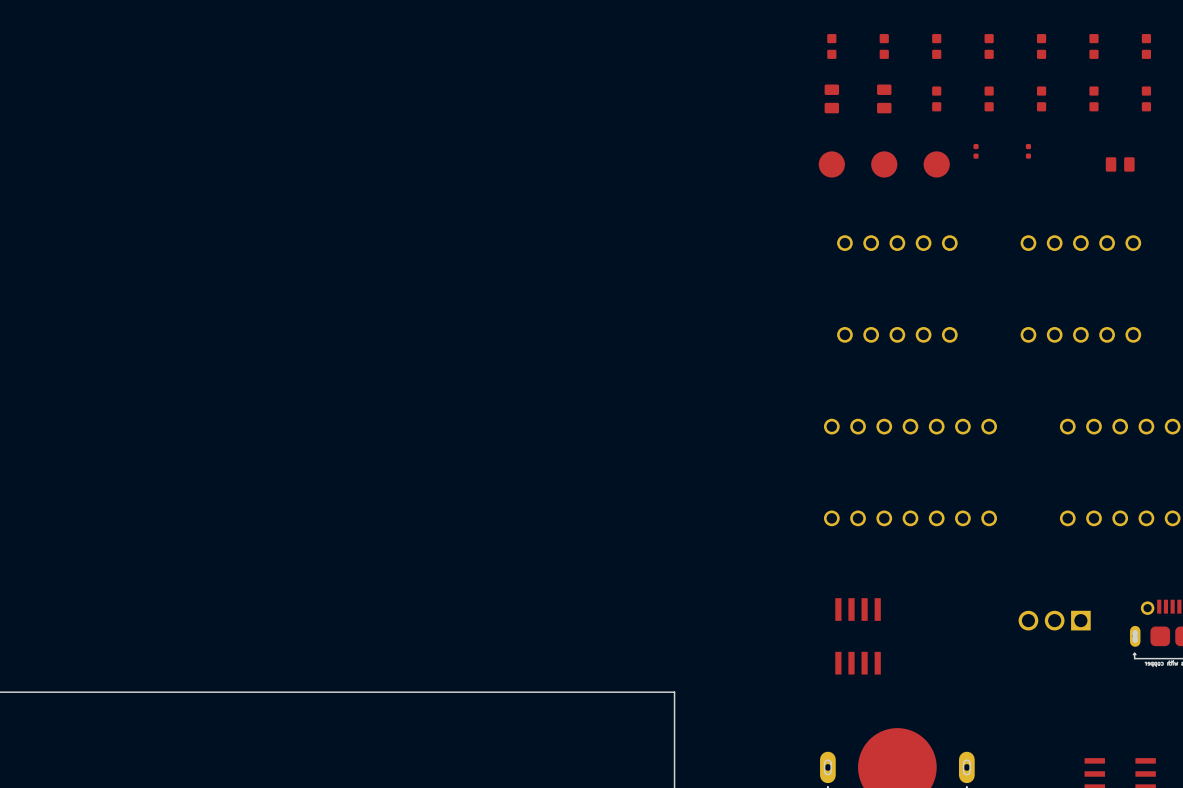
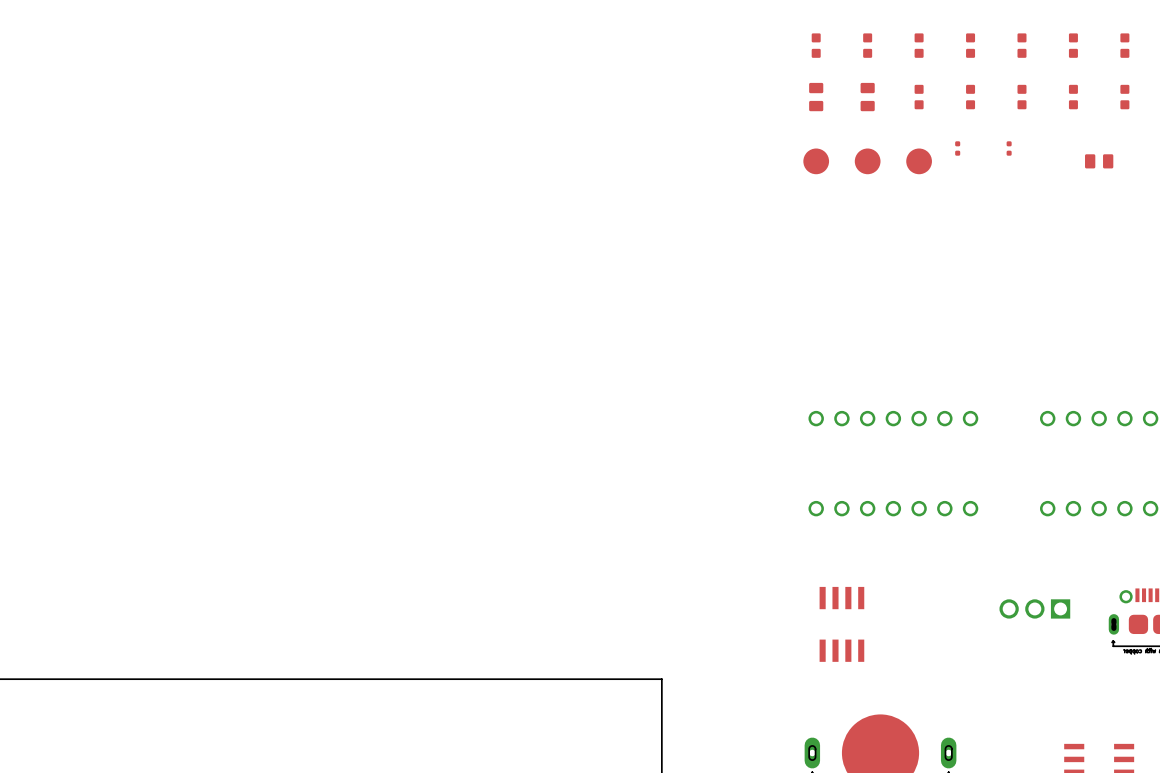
part: (897, 243) -> none
part: (1080, 243) -> none
part: (897, 334) -> none
part: (1080, 334) -> none

